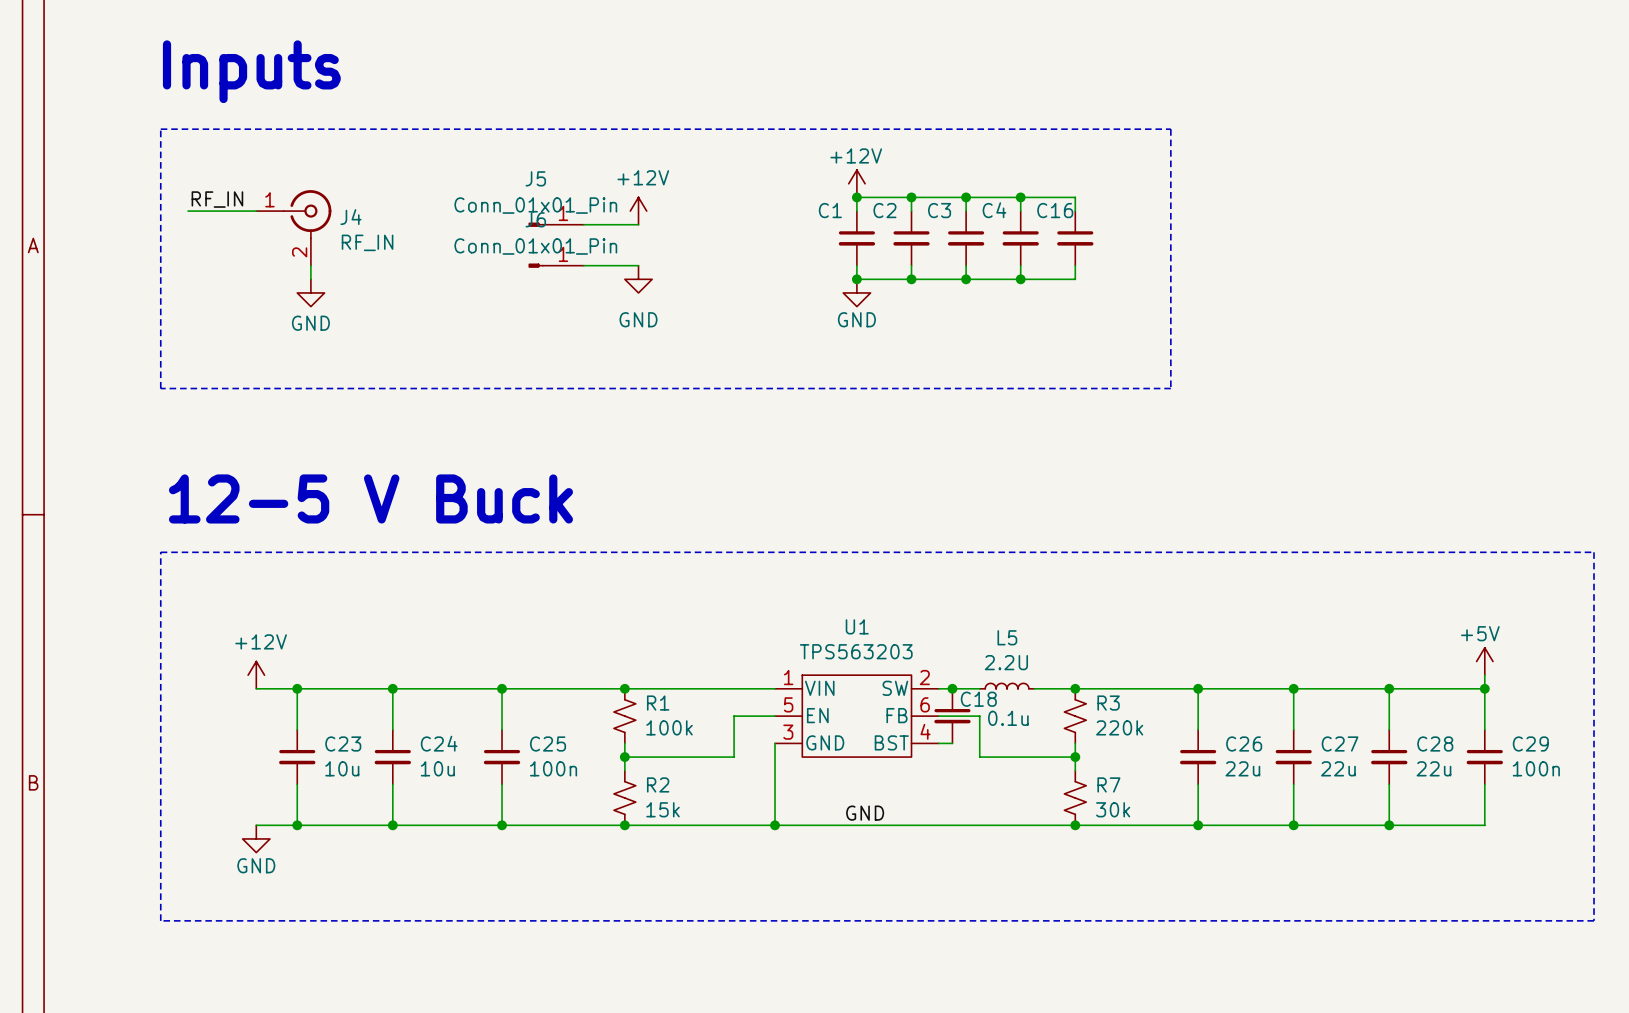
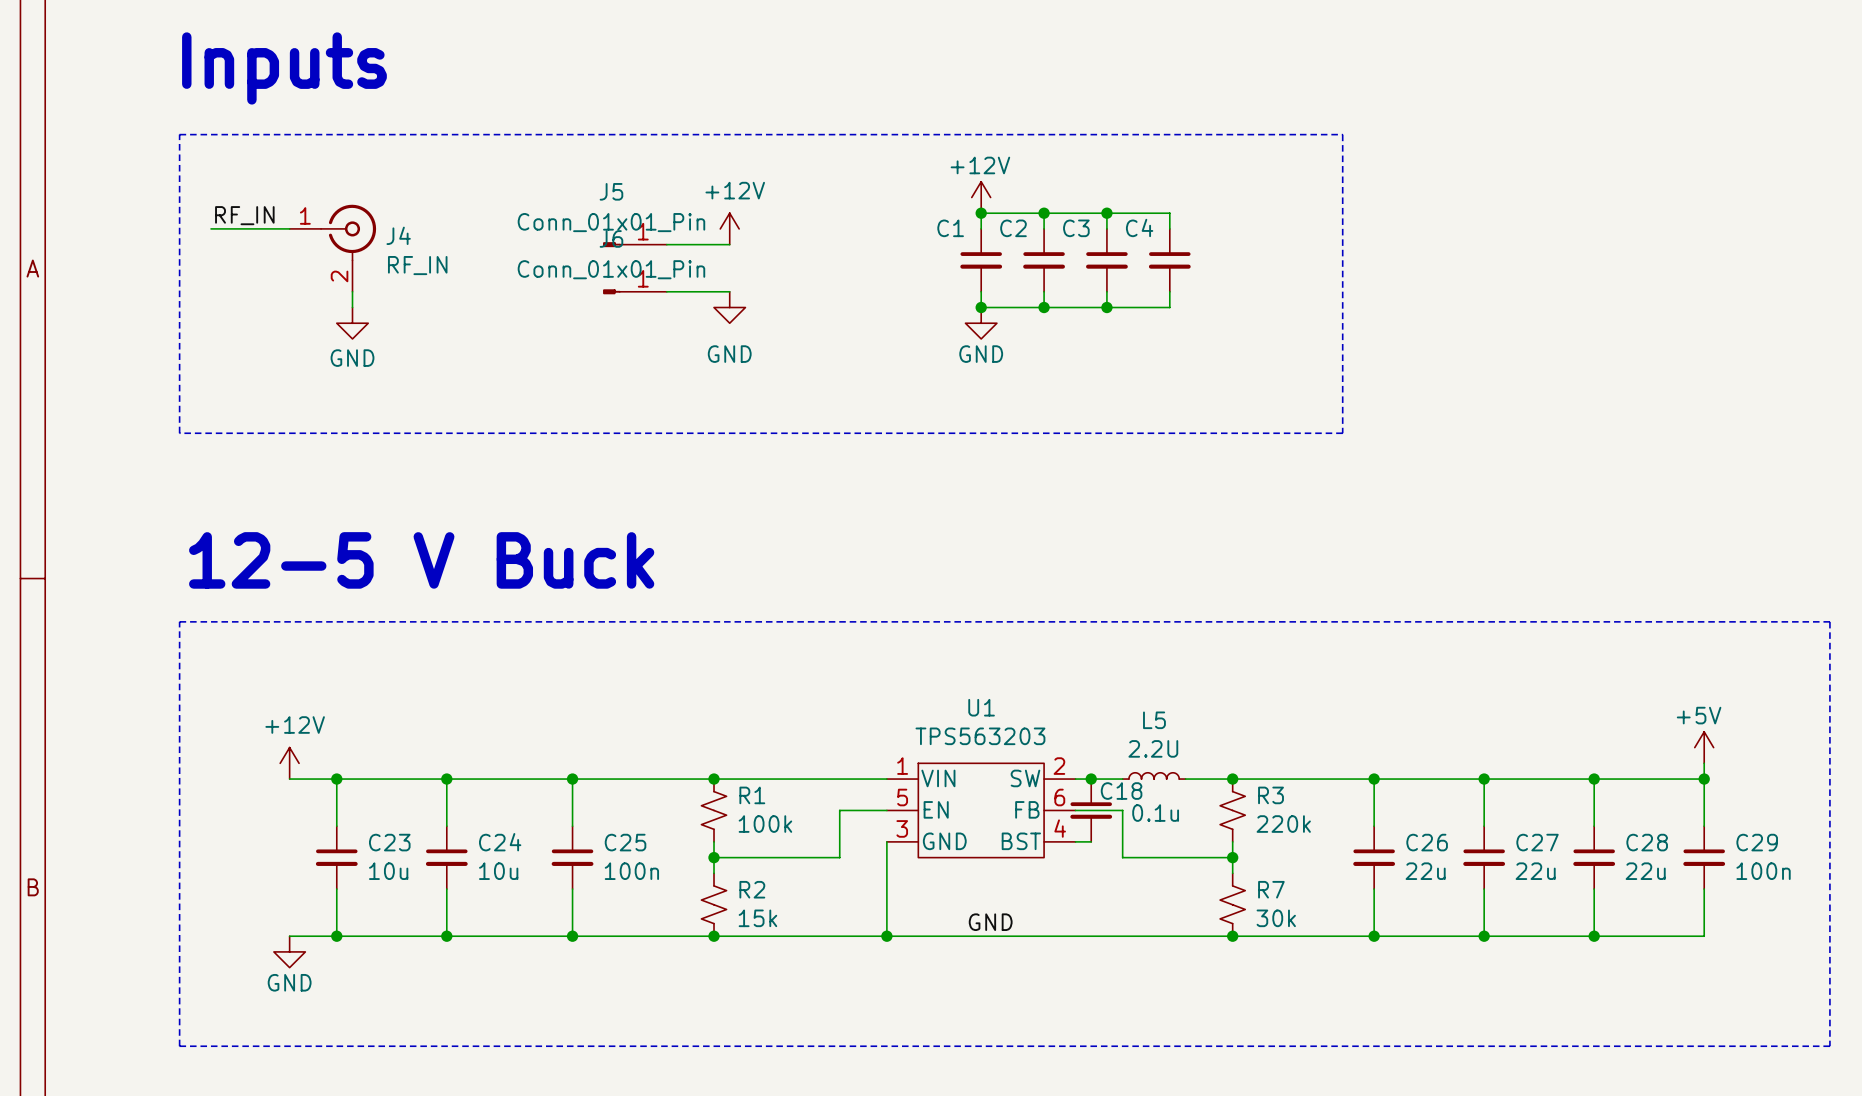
wire: (1020, 197) (1075, 197) (1075, 211) -> none
junction: (1020, 197) -> none
C16: (1075, 238) -> none
wire: (1075, 265) (1075, 279) (1020, 279) -> none
junction: (1020, 279) -> none

